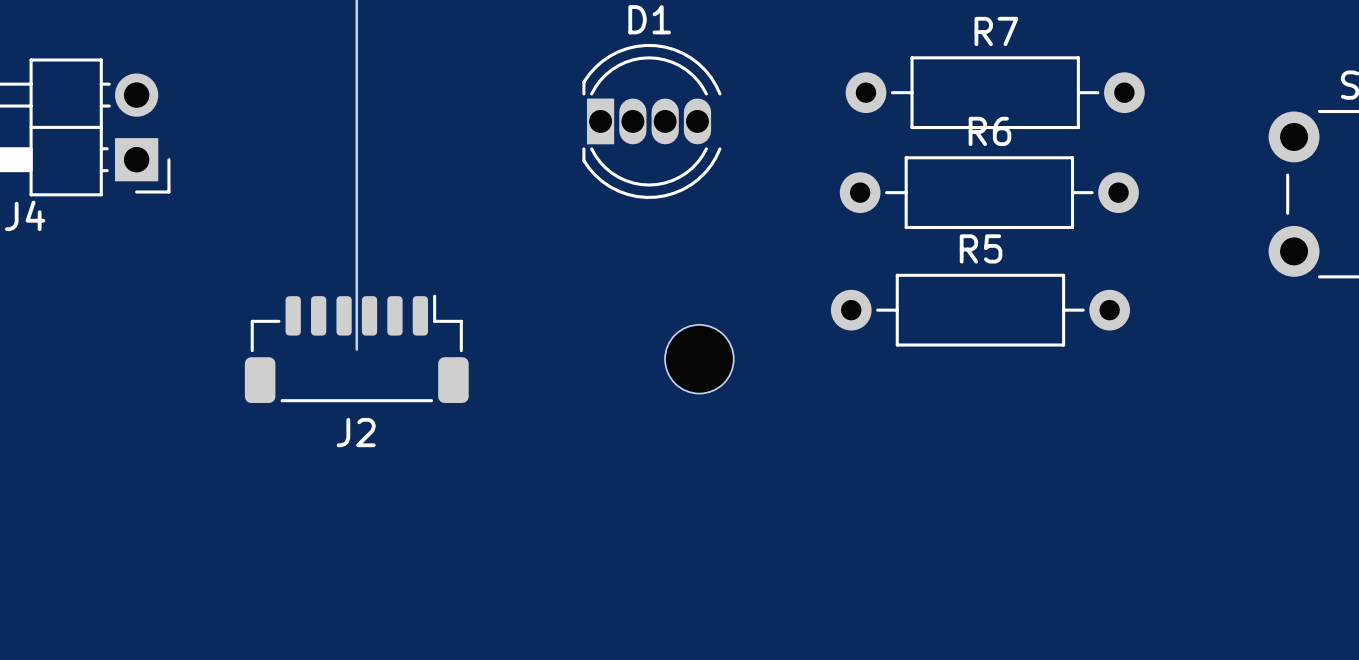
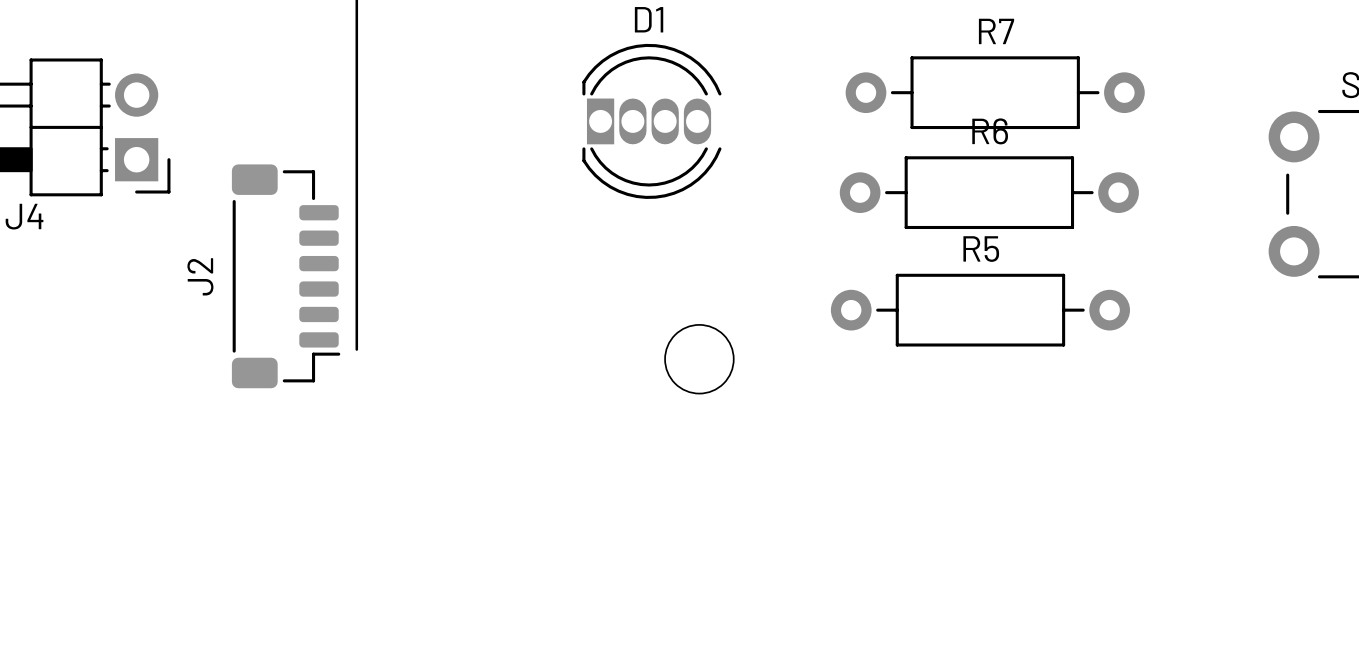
J2 rotation: 0° (356, 348) -> 90° clockwise (286, 276)

